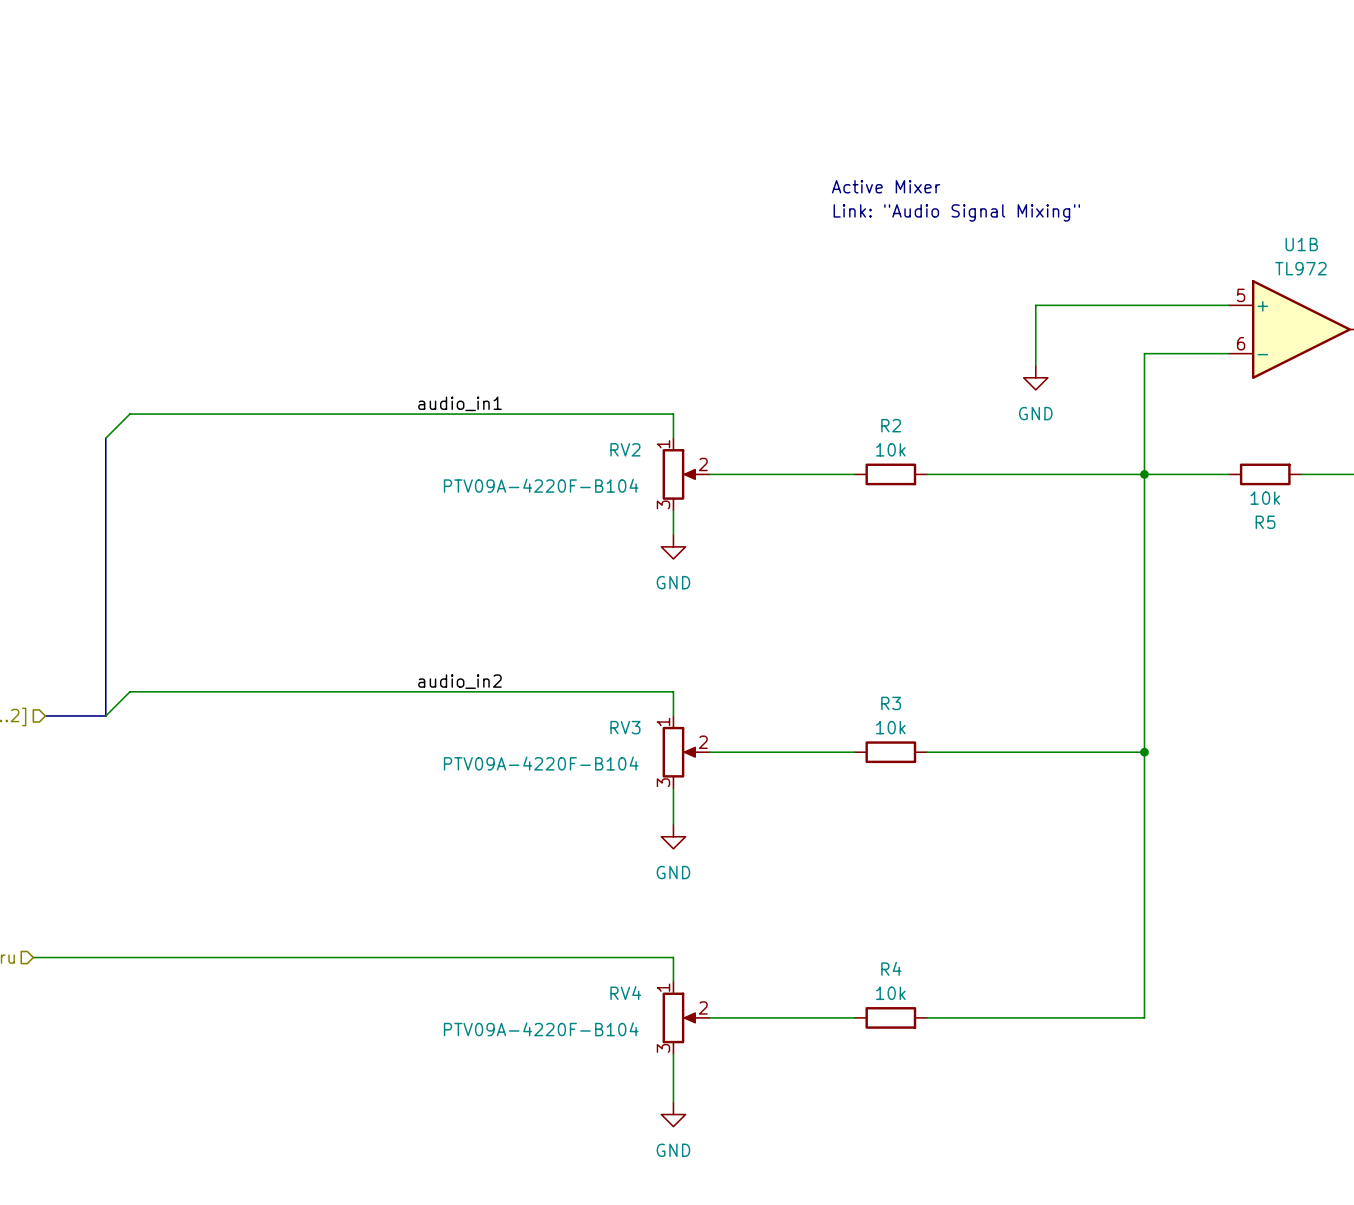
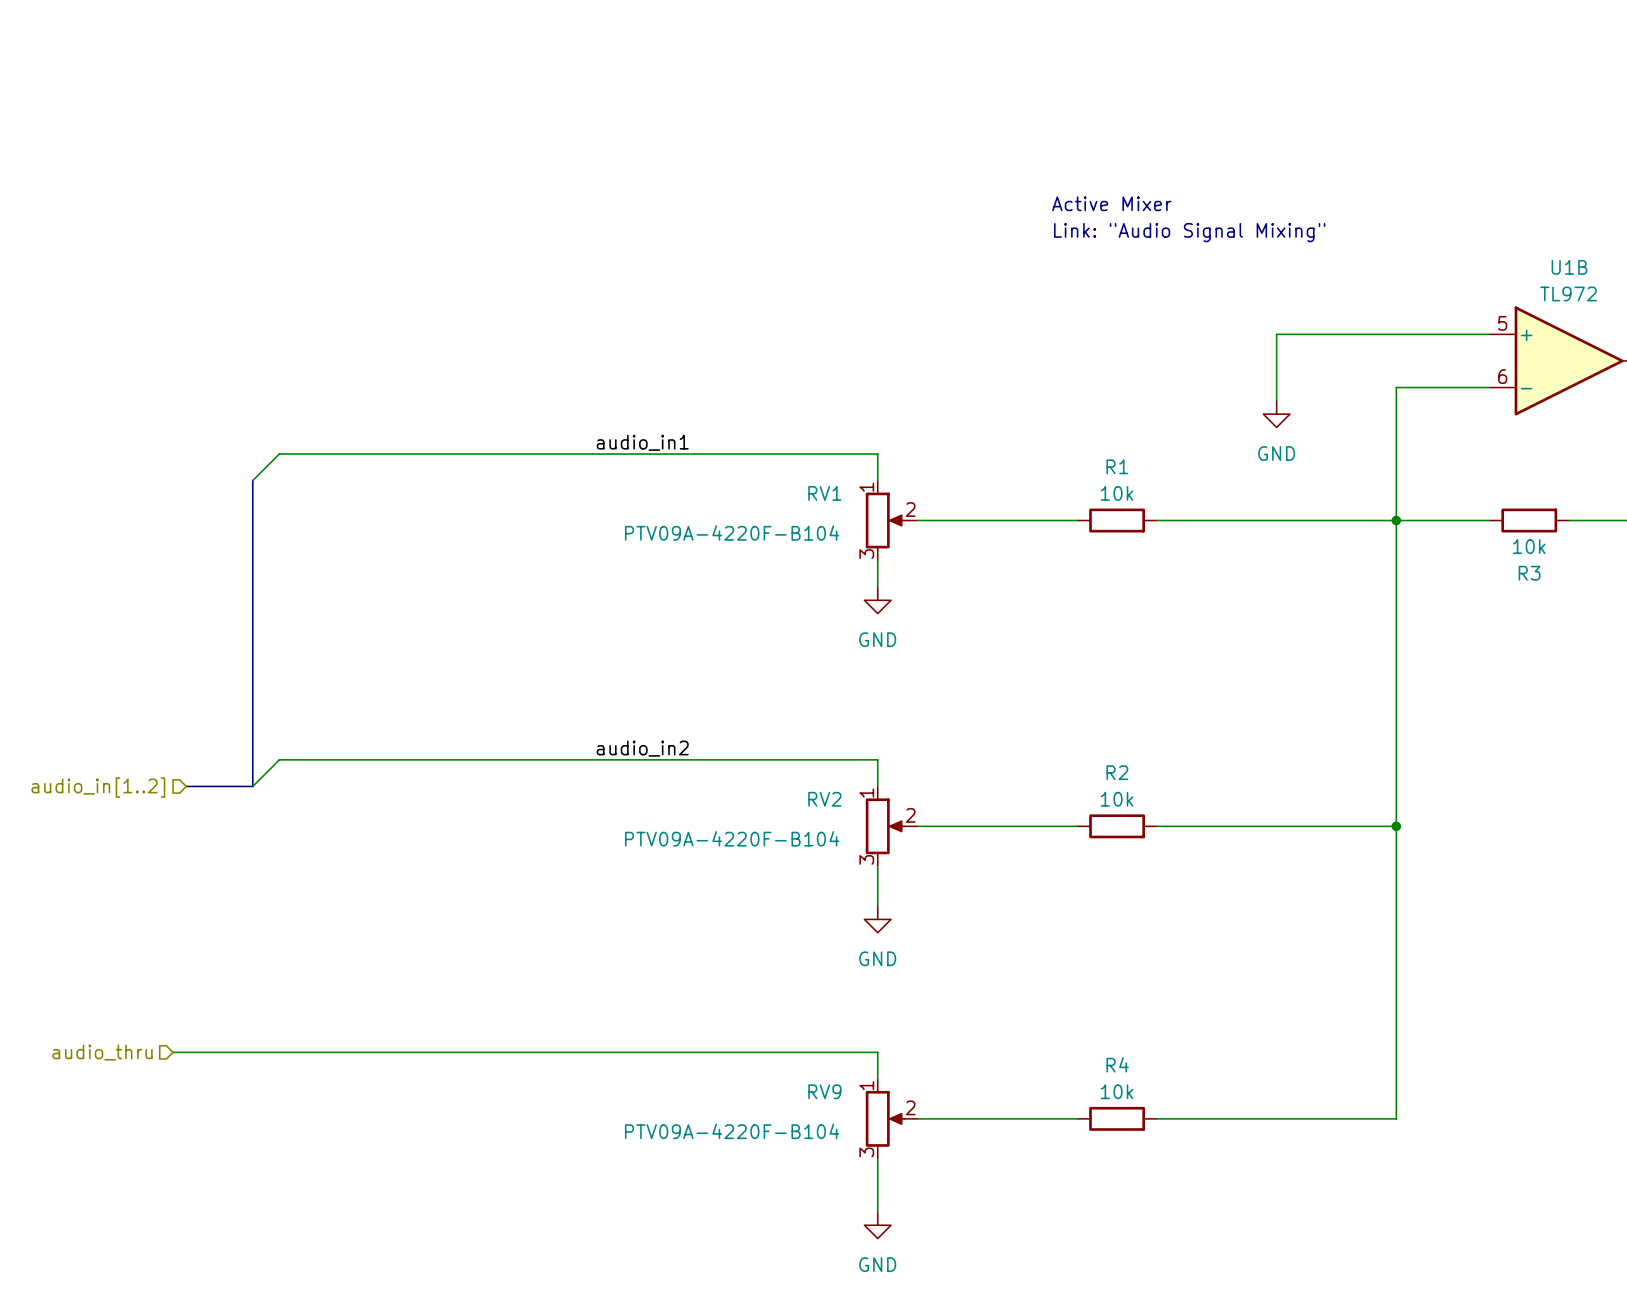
R2 name: R2 (891, 425) -> R1 (1117, 466)
RV2 name: RV2 (625, 449) -> RV1 (824, 493)
R5 name: R5 (1265, 522) -> R3 (1529, 573)
R3 name: R3 (891, 703) -> R2 (1117, 772)
RV3 name: RV3 (625, 727) -> RV2 (824, 799)
RV4 name: RV4 (625, 993) -> RV9 (824, 1091)

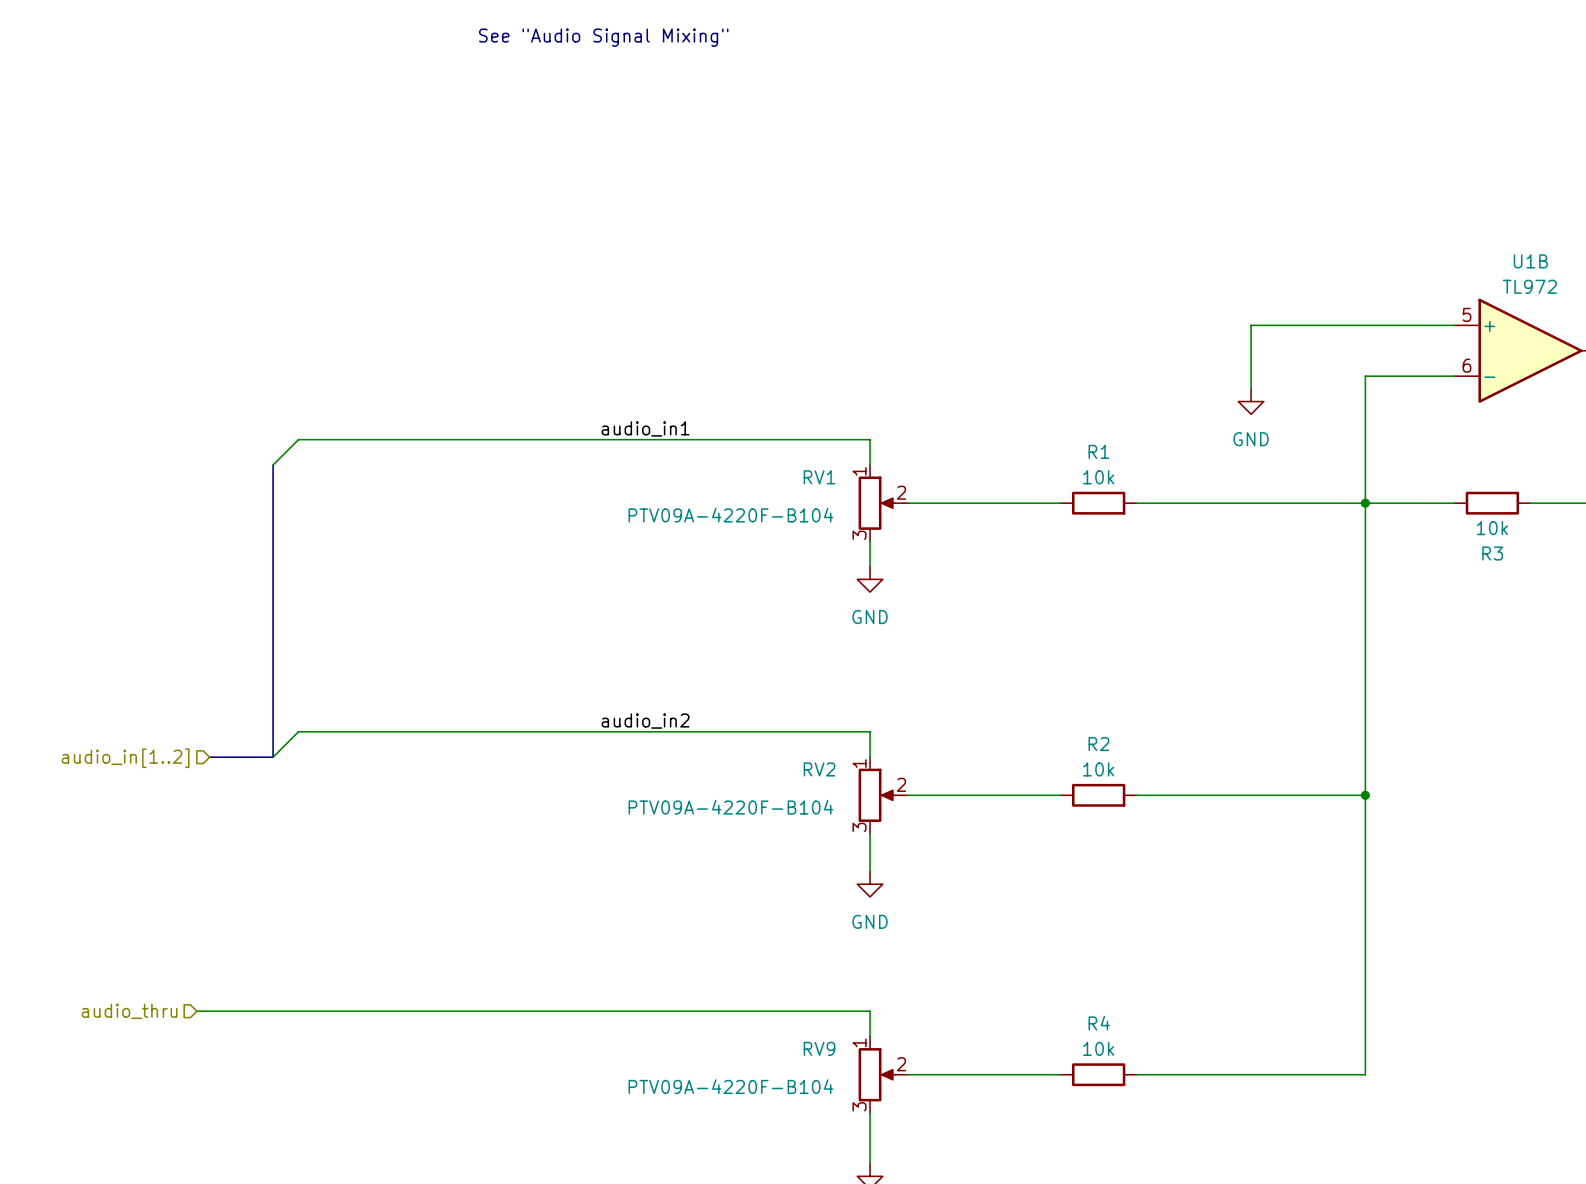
text: none -> See "Audio Signal Mixing" (603, 37)
text: Active Mixer (1111, 203) -> none
text: Link: "Audio Signal Mixing" (1189, 232) -> none

